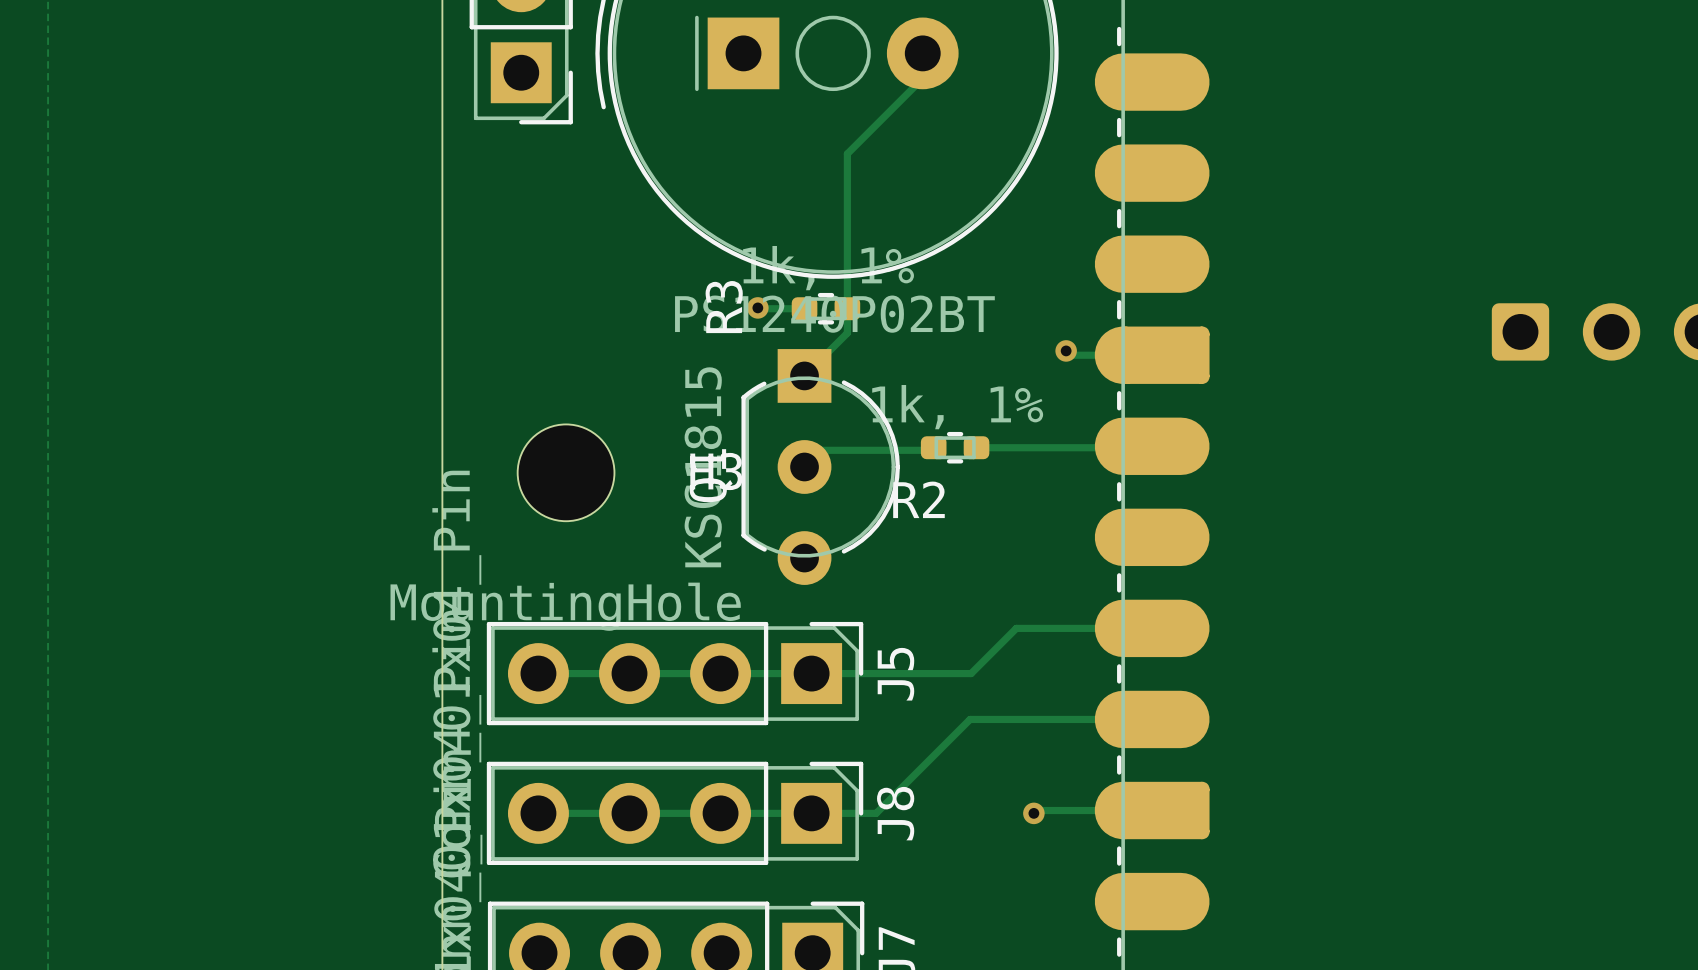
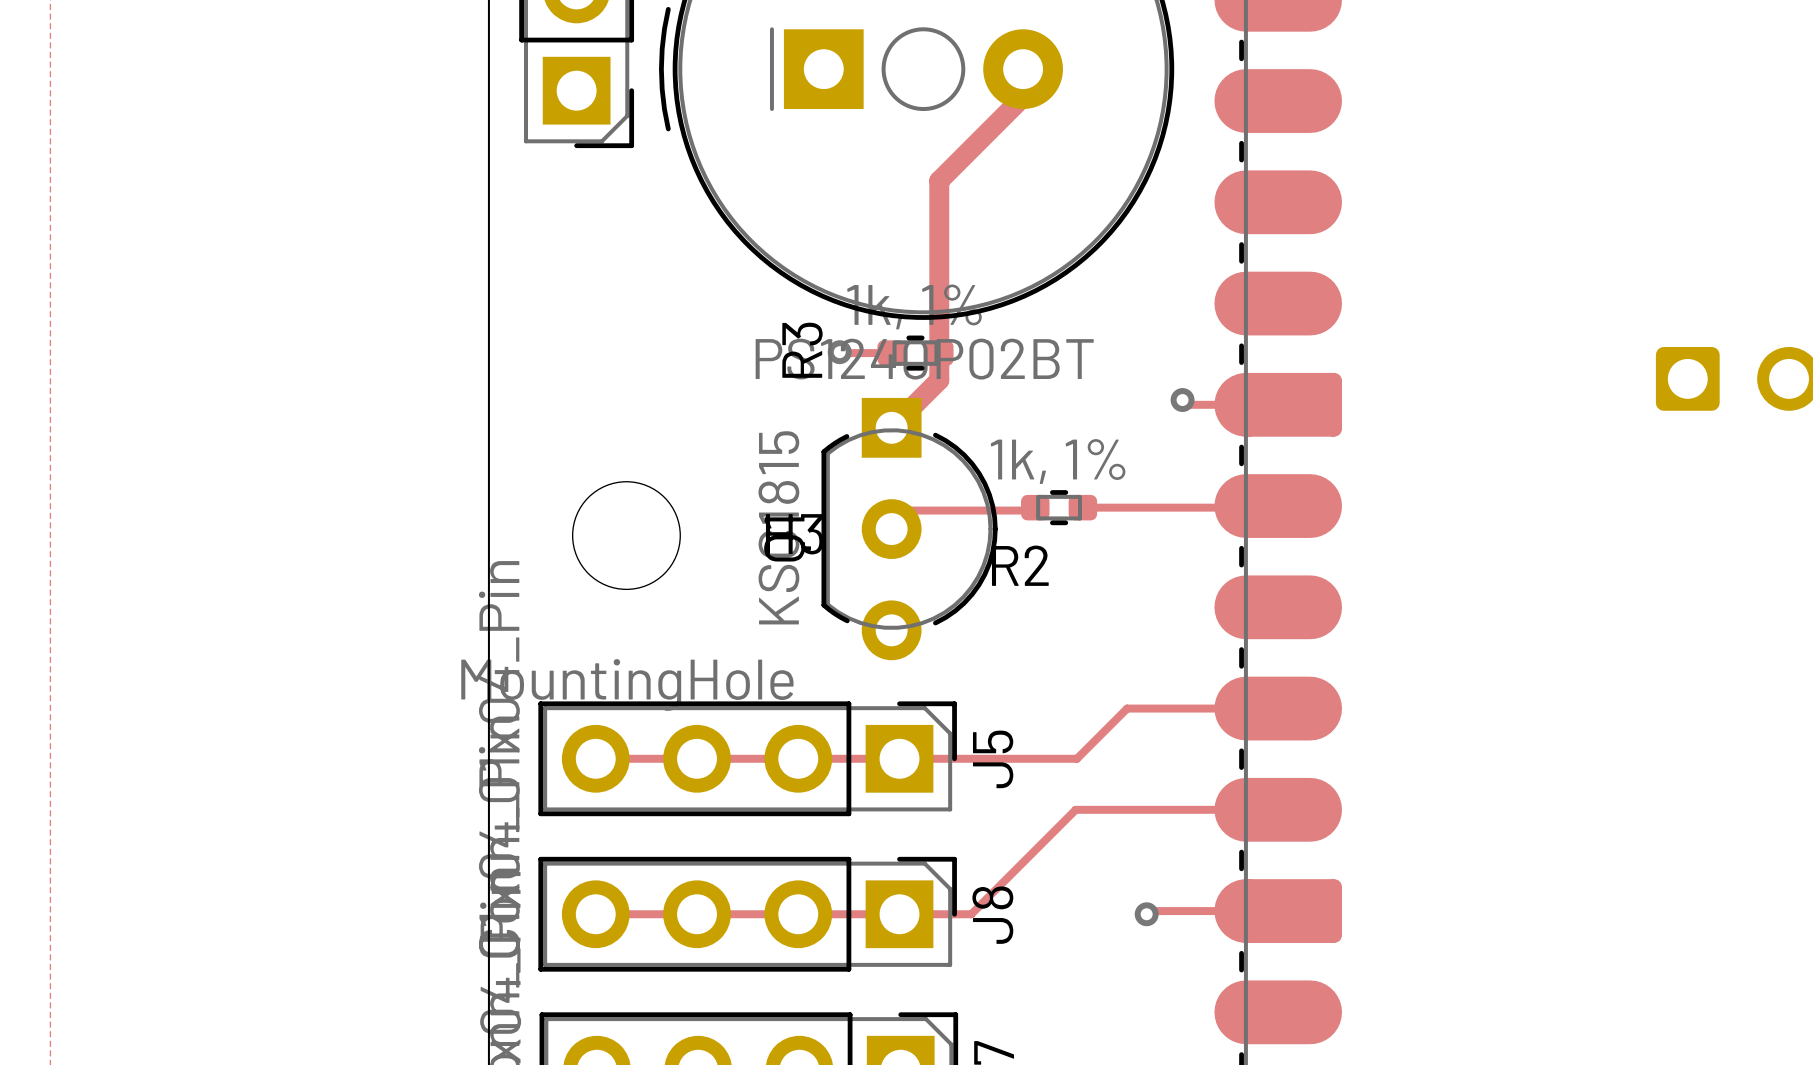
track width: thin (947, 53) (847, 153) (847, 333) (804, 375) -> thick (1051, 69) (939, 180) (939, 380) (891, 427)

